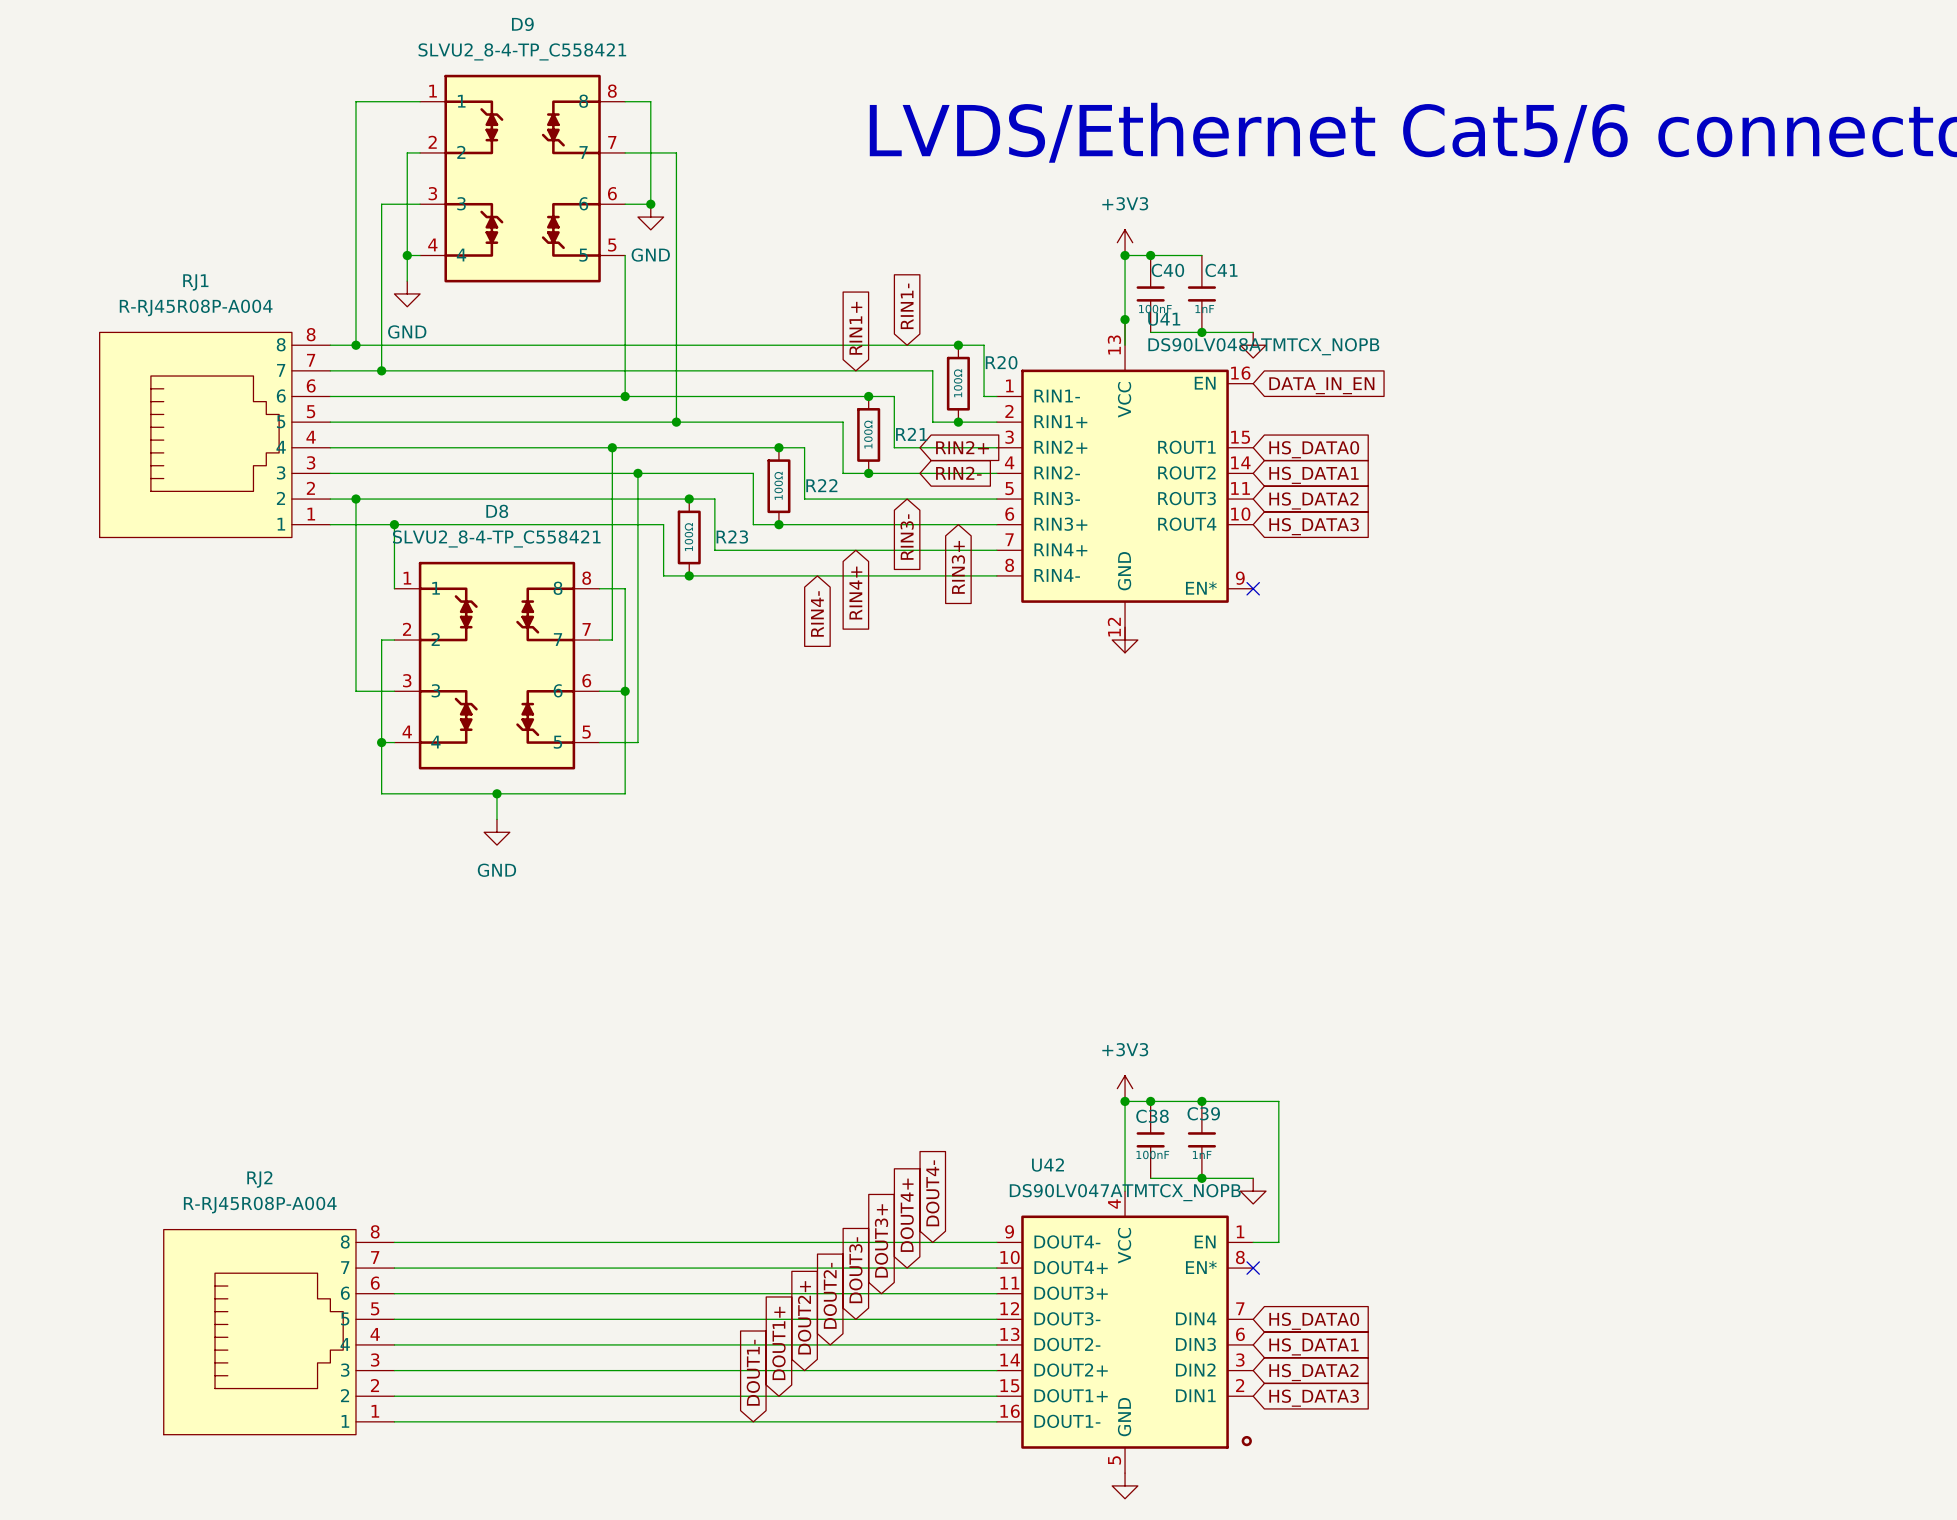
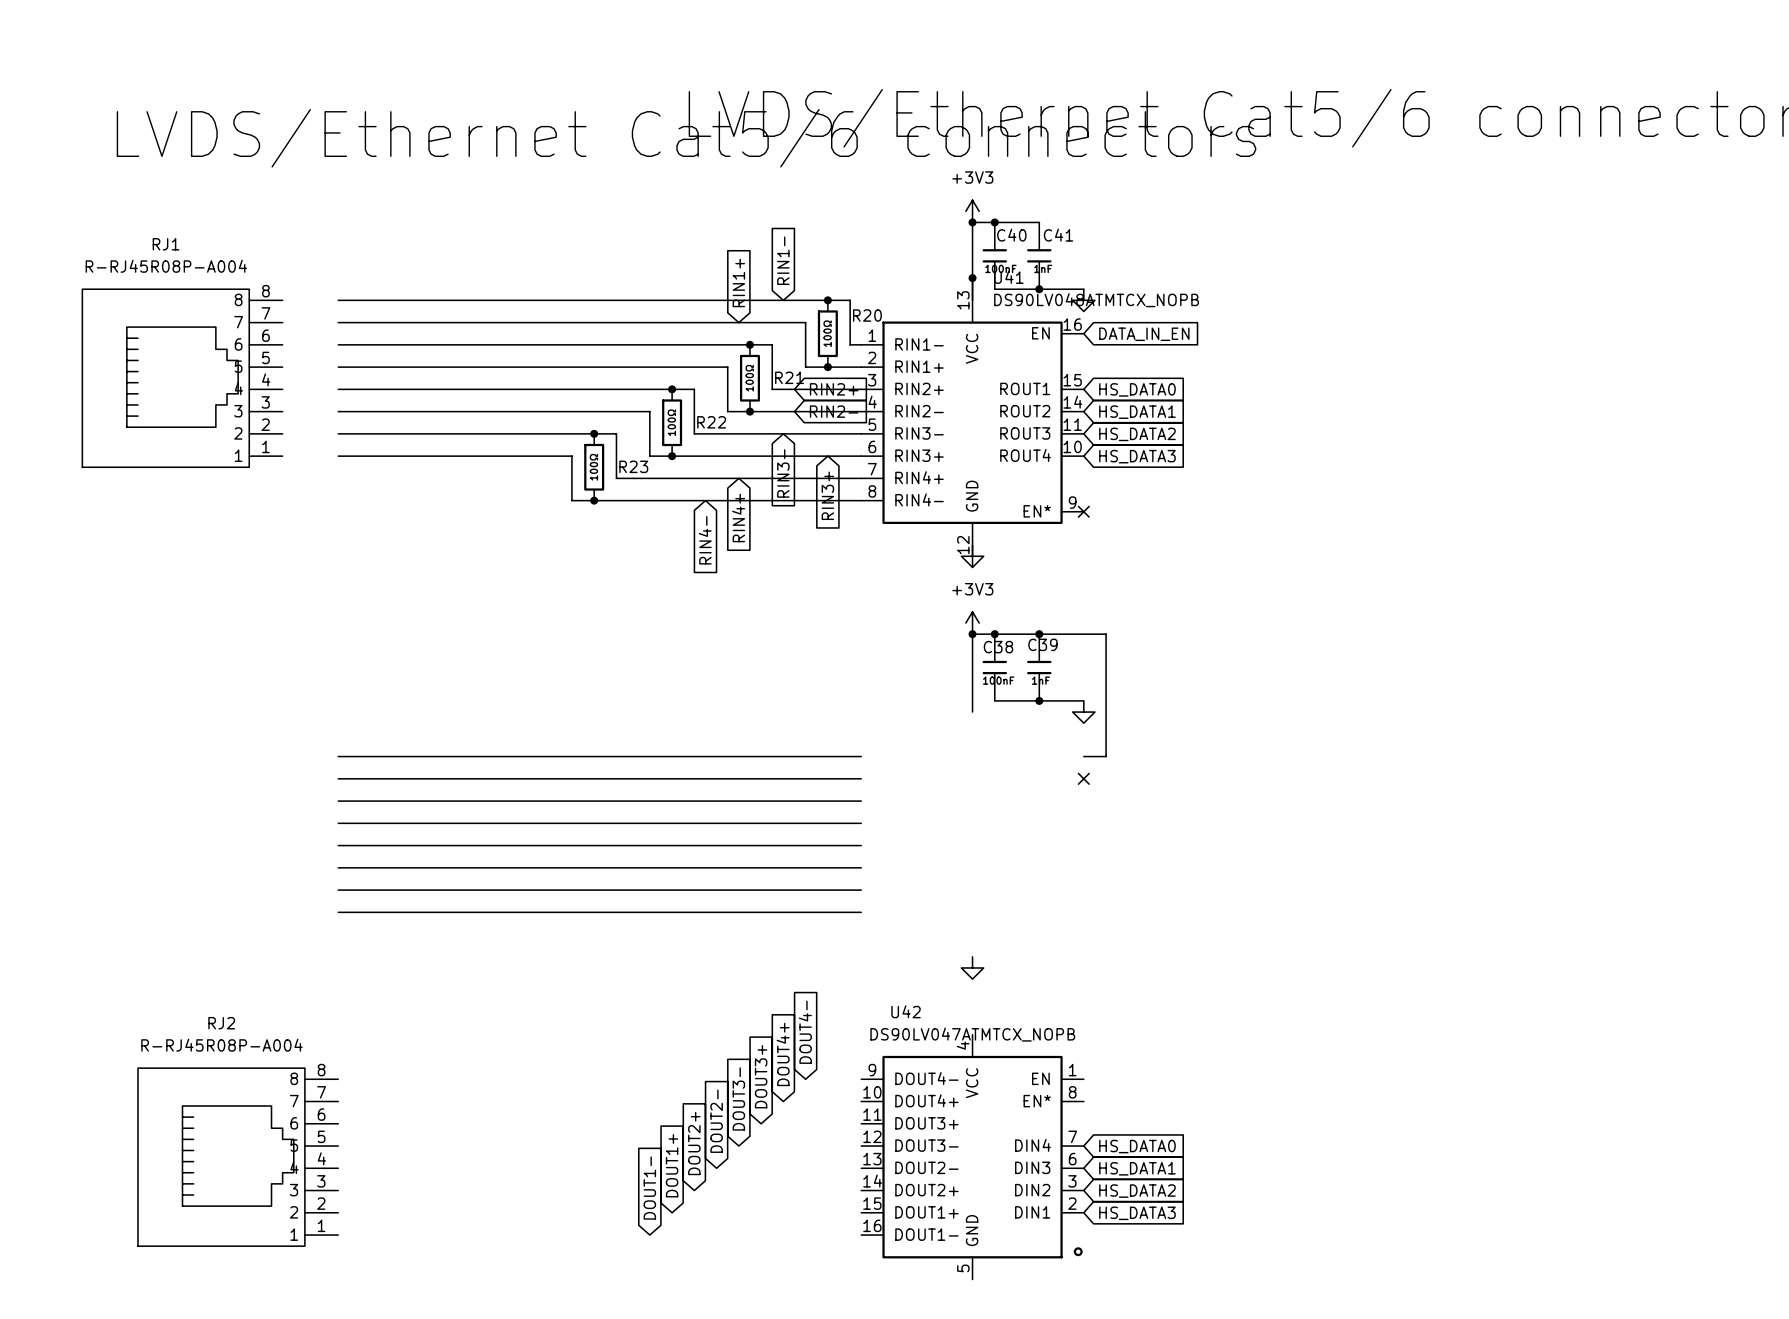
wire: (420, 101) (355, 101) (355, 345) -> none
wire: (625, 101) (650, 101) (650, 204) (625, 204) -> none
wire: (420, 152) (407, 152) (407, 281) -> none
wire: (625, 152) (676, 152) (676, 422) -> none
text: none -> LVDS/Ethernet Cat5/6 connectors (686, 138)
D9: SLVU2_8-4-TP_C558421 (522, 178) -> none
wire: (420, 204) (381, 204) (381, 370) -> none
junction: (650, 204) -> none
power symbol: GND (650, 217) -> none
wire: (407, 255) (420, 255) -> none
junction: (407, 255) -> none
wire: (625, 255) (625, 396) -> none
power symbol: GND (407, 293) -> none
wire: (330, 345) (394, 345) -> none
junction: (355, 345) -> none
wire: (330, 370) (394, 370) -> none
junction: (381, 370) -> none
wire: (330, 396) (394, 396) -> none
junction: (625, 396) -> none
wire: (330, 422) (394, 422) -> none
junction: (676, 422) -> none
wire: (330, 447) (394, 447) -> none
wire: (612, 447) (612, 640) (599, 640) -> none
junction: (612, 447) -> none
wire: (330, 473) (394, 473) -> none
wire: (637, 473) (637, 742) (599, 742) -> none
junction: (637, 473) -> none
wire: (330, 499) (394, 499) -> none
wire: (355, 499) (355, 691) (394, 691) -> none
junction: (355, 499) -> none
wire: (330, 524) (394, 524) (394, 588) -> none
junction: (394, 524) -> none
wire: (599, 588) (625, 588) (625, 793) (381, 793) (381, 640) (394, 640) -> none
D8: SLVU2_8-4-TP_C558421 (496, 665) -> none
wire: (599, 691) (625, 691) -> none
junction: (625, 691) -> none
power symbol: none -> +3V3 (972, 623)
junction: none -> (972, 634)
junction: none -> (994, 634)
junction: none -> (1039, 634)
wire: (381, 742) (394, 742) -> none
junction: (381, 742) -> none
wire: (496, 793) (496, 819) -> none
junction: (496, 793) -> none
wire: none -> (994, 700) (1083, 700)
junction: none -> (1039, 700)
wire: none -> (972, 712) (972, 634) (1106, 634) (1106, 756) (1083, 756)
power symbol: none -> (1083, 712)
power symbol: GND (496, 832) -> none
wire: none -> (338, 756) (861, 756)
wire: none -> (338, 778) (861, 778)
no-connect mark: none -> (1083, 778)
wire: none -> (338, 801) (861, 801)
wire: none -> (338, 823) (861, 823)
wire: none -> (338, 845) (861, 845)
power symbol: +3V3 (1125, 1088) -> none
junction: (1125, 1101) -> none
junction: (1150, 1101) -> none
junction: (1201, 1101) -> none
C38 position: (1150, 1139) -> (994, 667)
C39 position: (1201, 1139) -> (1039, 667)
wire: (1150, 1178) (1253, 1178) -> none
junction: (1201, 1178) -> none
wire: (1125, 1191) (1125, 1101) (1278, 1101) (1278, 1242) (1253, 1242) -> none
power symbol position: (1253, 1191) -> (972, 967)
wire: (394, 1242) (996, 1242) -> (338, 867) (861, 867)
wire: (394, 1268) (996, 1268) -> (338, 890) (861, 890)
no-connect mark: (1253, 1268) -> none
wire: (394, 1293) (996, 1293) -> (338, 912) (861, 912)
wire: (394, 1319) (996, 1319) -> none
wire: (394, 1344) (996, 1344) -> none
wire: (394, 1370) (996, 1370) -> none
wire: (394, 1396) (996, 1396) -> none
wire: (394, 1421) (996, 1421) -> none
power symbol: (1125, 1485) -> none

